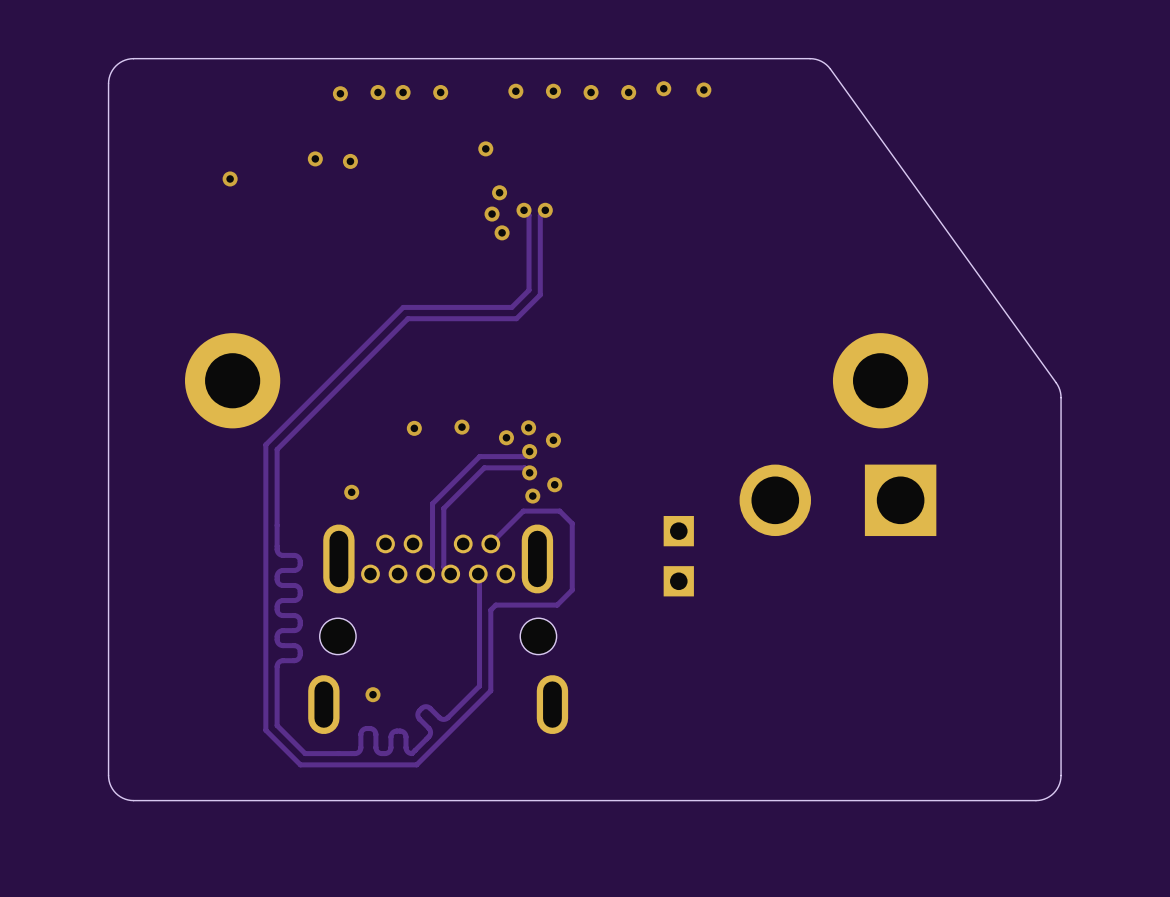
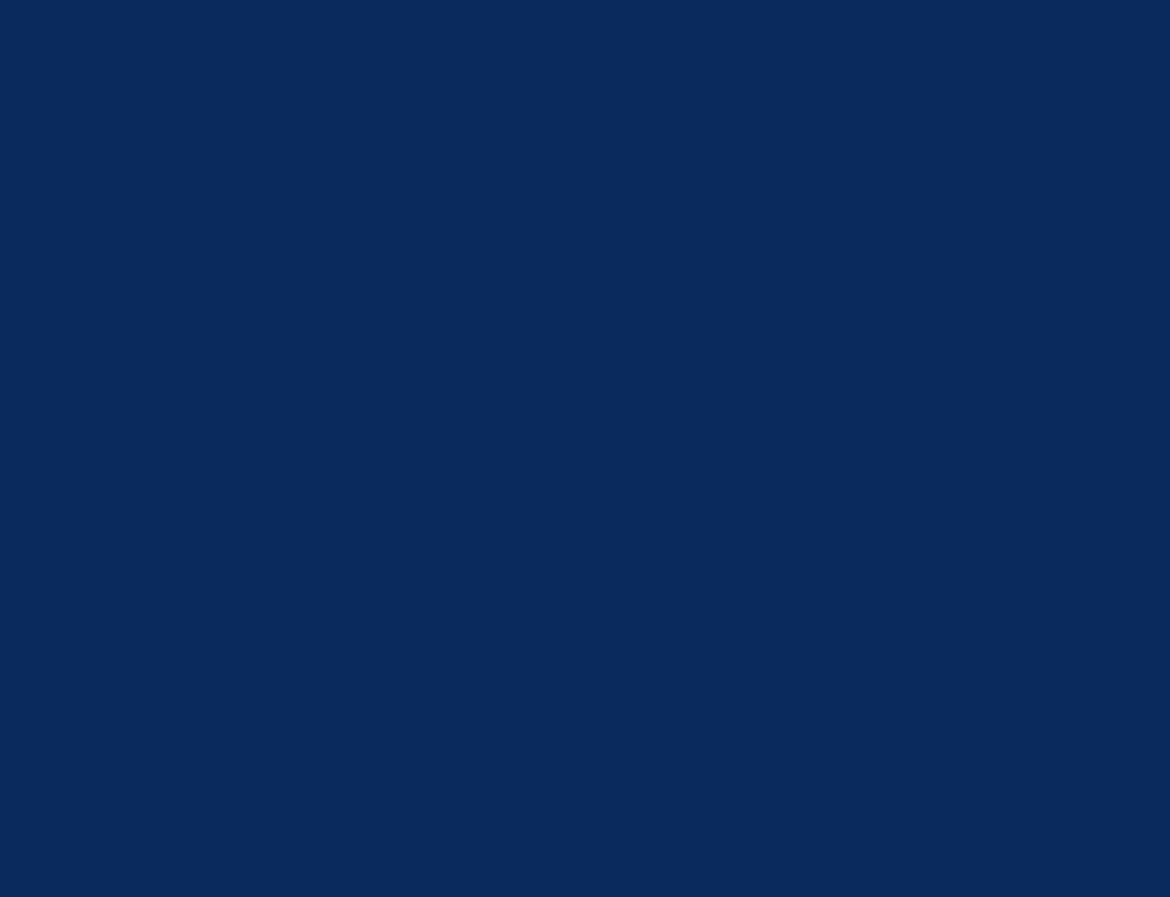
board edge: (810, 58) (133, 58) (125, 60) (115, 65) (109, 75) (108, 83) (108, 775) (111, 786) (115, 793) (125, 799) (133, 800) (1035, 800) (1044, 799) (1053, 793) (1059, 783) (1061, 775) (1059, 389) (830, 69) (821, 61) (810, 58) -> none
via: (663, 88) -> none
via: (703, 89) -> none
via: (515, 91) -> none
via: (553, 91) -> none
via: (378, 92) -> none
via: (403, 92) -> none
via: (440, 92) -> none
via: (591, 92) -> none
via: (628, 92) -> none
via: (340, 93) -> none
via: (485, 148) -> none
via: (315, 158) -> none
via: (350, 161) -> none
via: (230, 178) -> none
via: (499, 192) -> none
track: (524, 210) (529, 215) (529, 290) (511, 307) (403, 307) (265, 444) (265, 730) (300, 764) (416, 764) (490, 690) (490, 610) (495, 605) (557, 605) (572, 590) (572, 523) (559, 511) (523, 511) (490, 543) -> none
via: (524, 210) -> none
track: (545, 210) (540, 215) (540, 294) (516, 318) (407, 318) (277, 449) (277, 550) (281, 555) (296, 556) (300, 561) (297, 569) (281, 570) (277, 575) (279, 584) (296, 585) (300, 591) (297, 599) (281, 600) (277, 603) (278, 613) (296, 616) (299, 619) (300, 624) (296, 630) (279, 631) (277, 641) (281, 645) (297, 646) (300, 654) (296, 660) (281, 660) (277, 664) (277, 725) (305, 753) (356, 753) (360, 748) (361, 732) (366, 728) (371, 728) (375, 731) (375, 748) (378, 752) (389, 751) (391, 734) (394, 731) (399, 731) (405, 734) (406, 749) (412, 753) (430, 733) (429, 728) (418, 717) (419, 710) (427, 706) (440, 718) (446, 718) (479, 686) (478, 574) -> none
via: (545, 210) -> none
via: (492, 214) -> none
via: (502, 232) -> none
part: (232, 380) -> none
part: (880, 380) -> none
via: (461, 427) -> none
via: (528, 427) -> none
via: (414, 428) -> none
via: (506, 437) -> none
via: (553, 440) -> none
track: (529, 451) (524, 456) (479, 456) (432, 503) (432, 567) (425, 574) -> none
via: (529, 451) -> none
track: (529, 472) (524, 467) (484, 467) (443, 508) (443, 567) (450, 574) -> none
via: (529, 472) -> none
via: (554, 484) -> none
via: (351, 492) -> none
via: (532, 496) -> none
part: (799, 530) -> none
part: (438, 629) -> none
via: (372, 694) -> none

